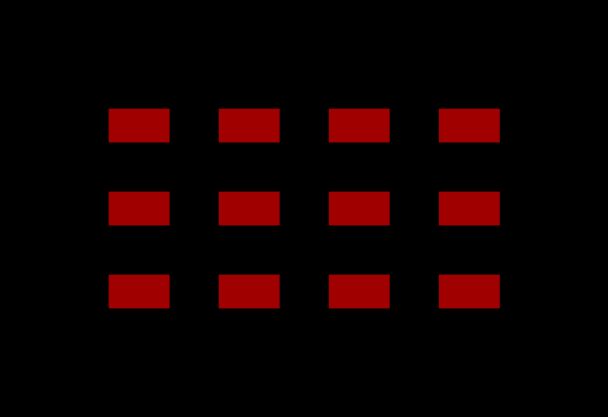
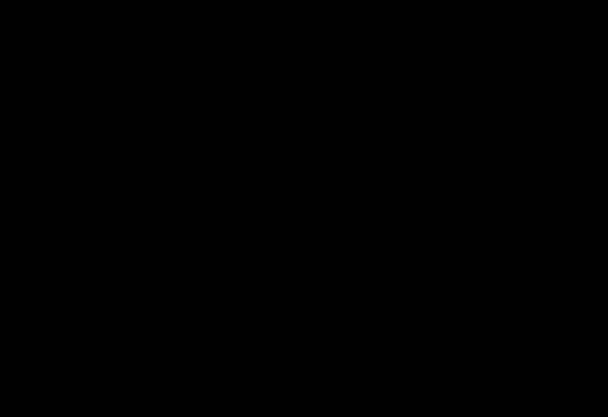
part: (139, 125) -> none
part: (249, 125) -> none
part: (359, 125) -> none
part: (469, 125) -> none
part: (139, 208) -> none
part: (249, 208) -> none
part: (359, 208) -> none
part: (469, 208) -> none
part: (139, 291) -> none
part: (249, 291) -> none
part: (359, 291) -> none
part: (469, 291) -> none

